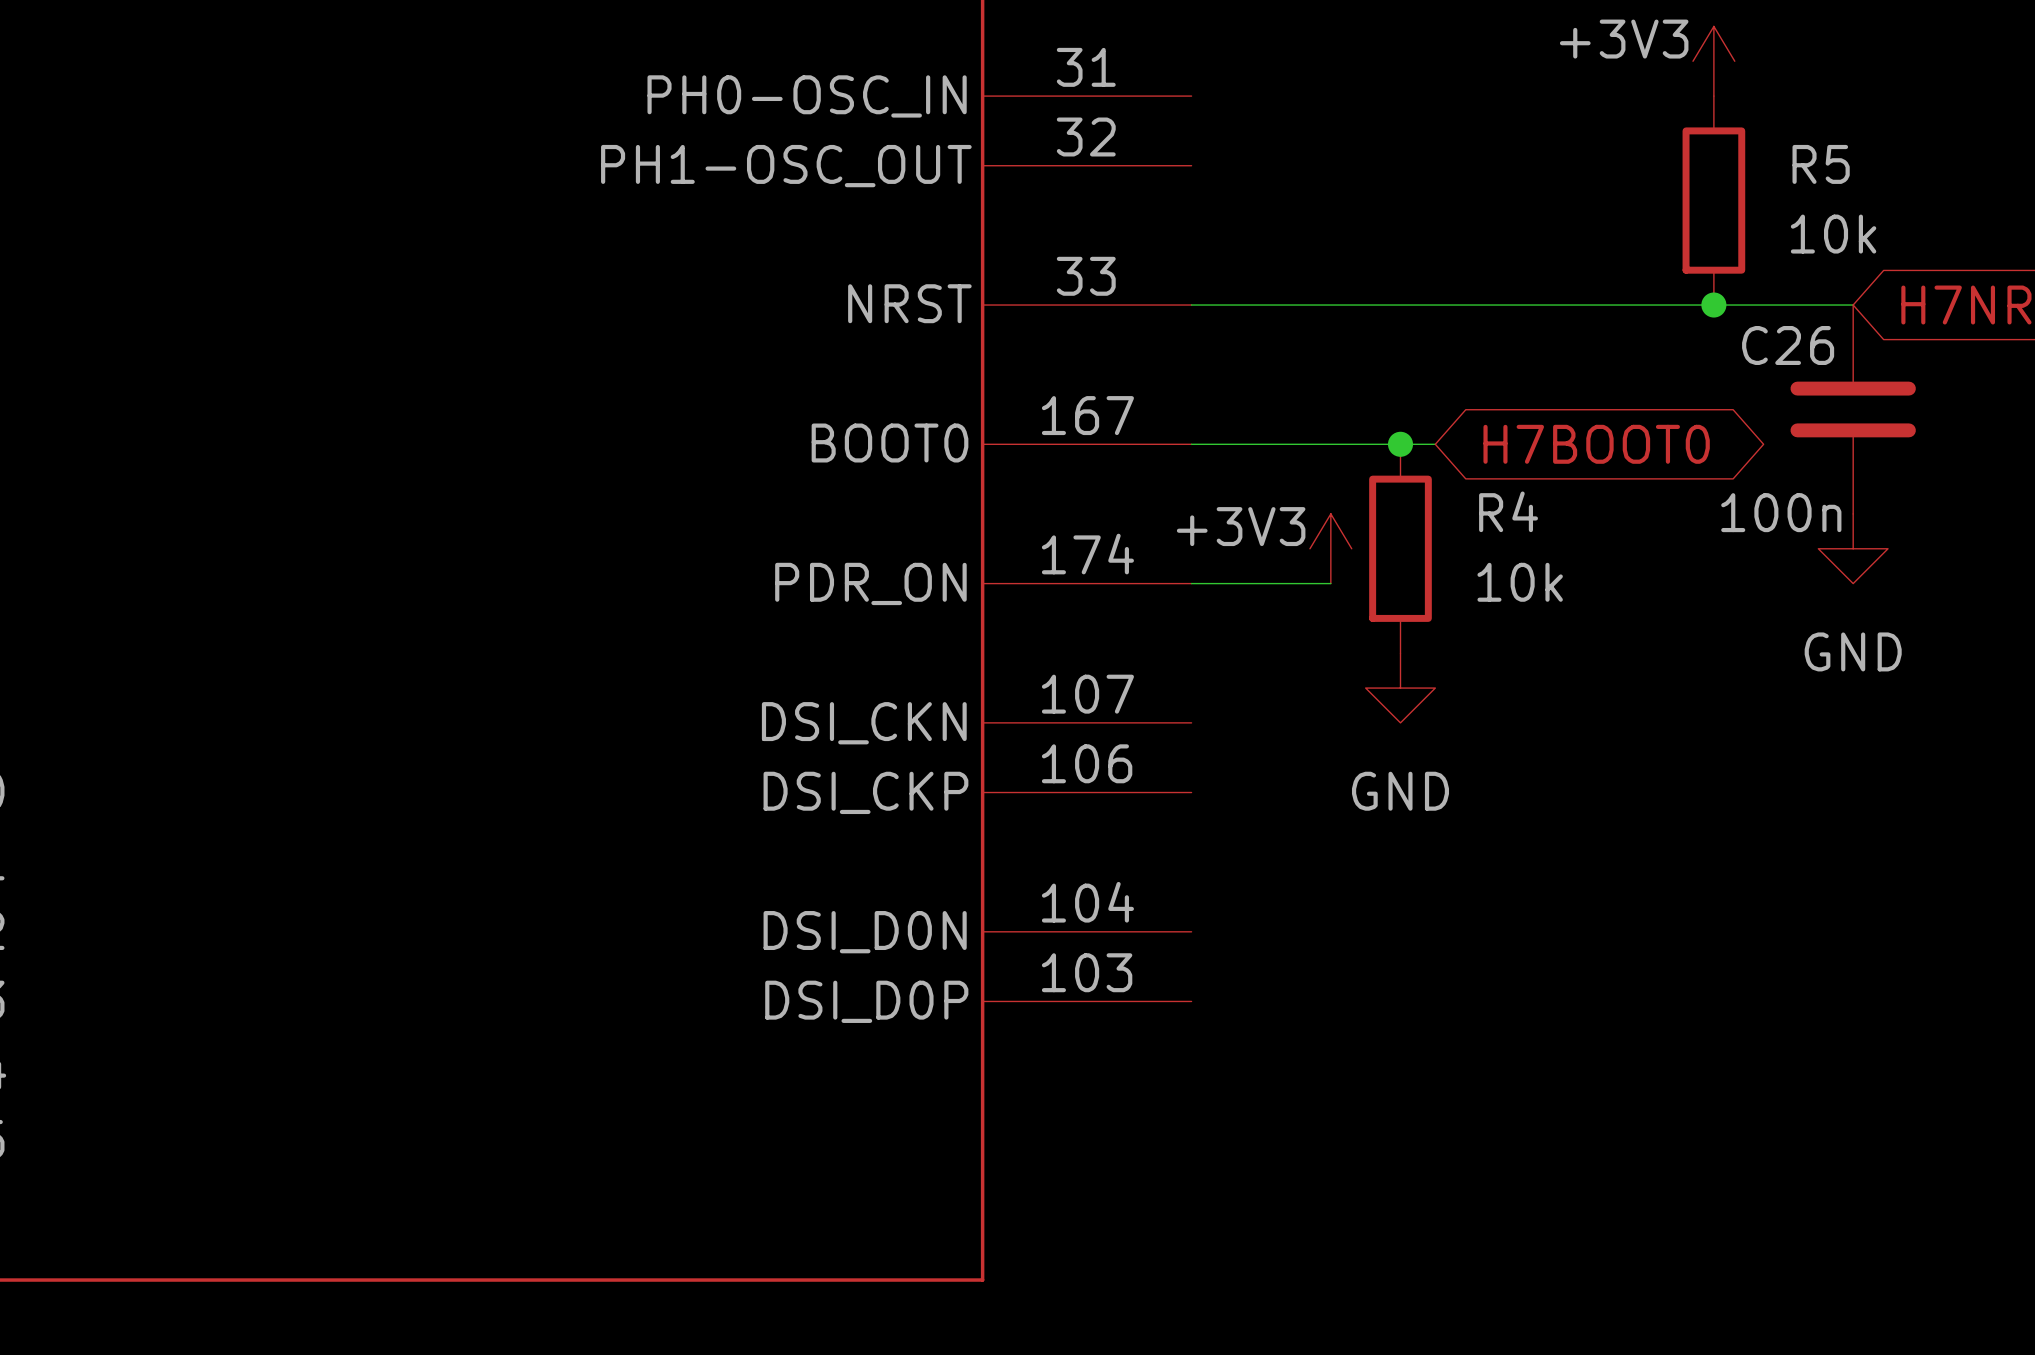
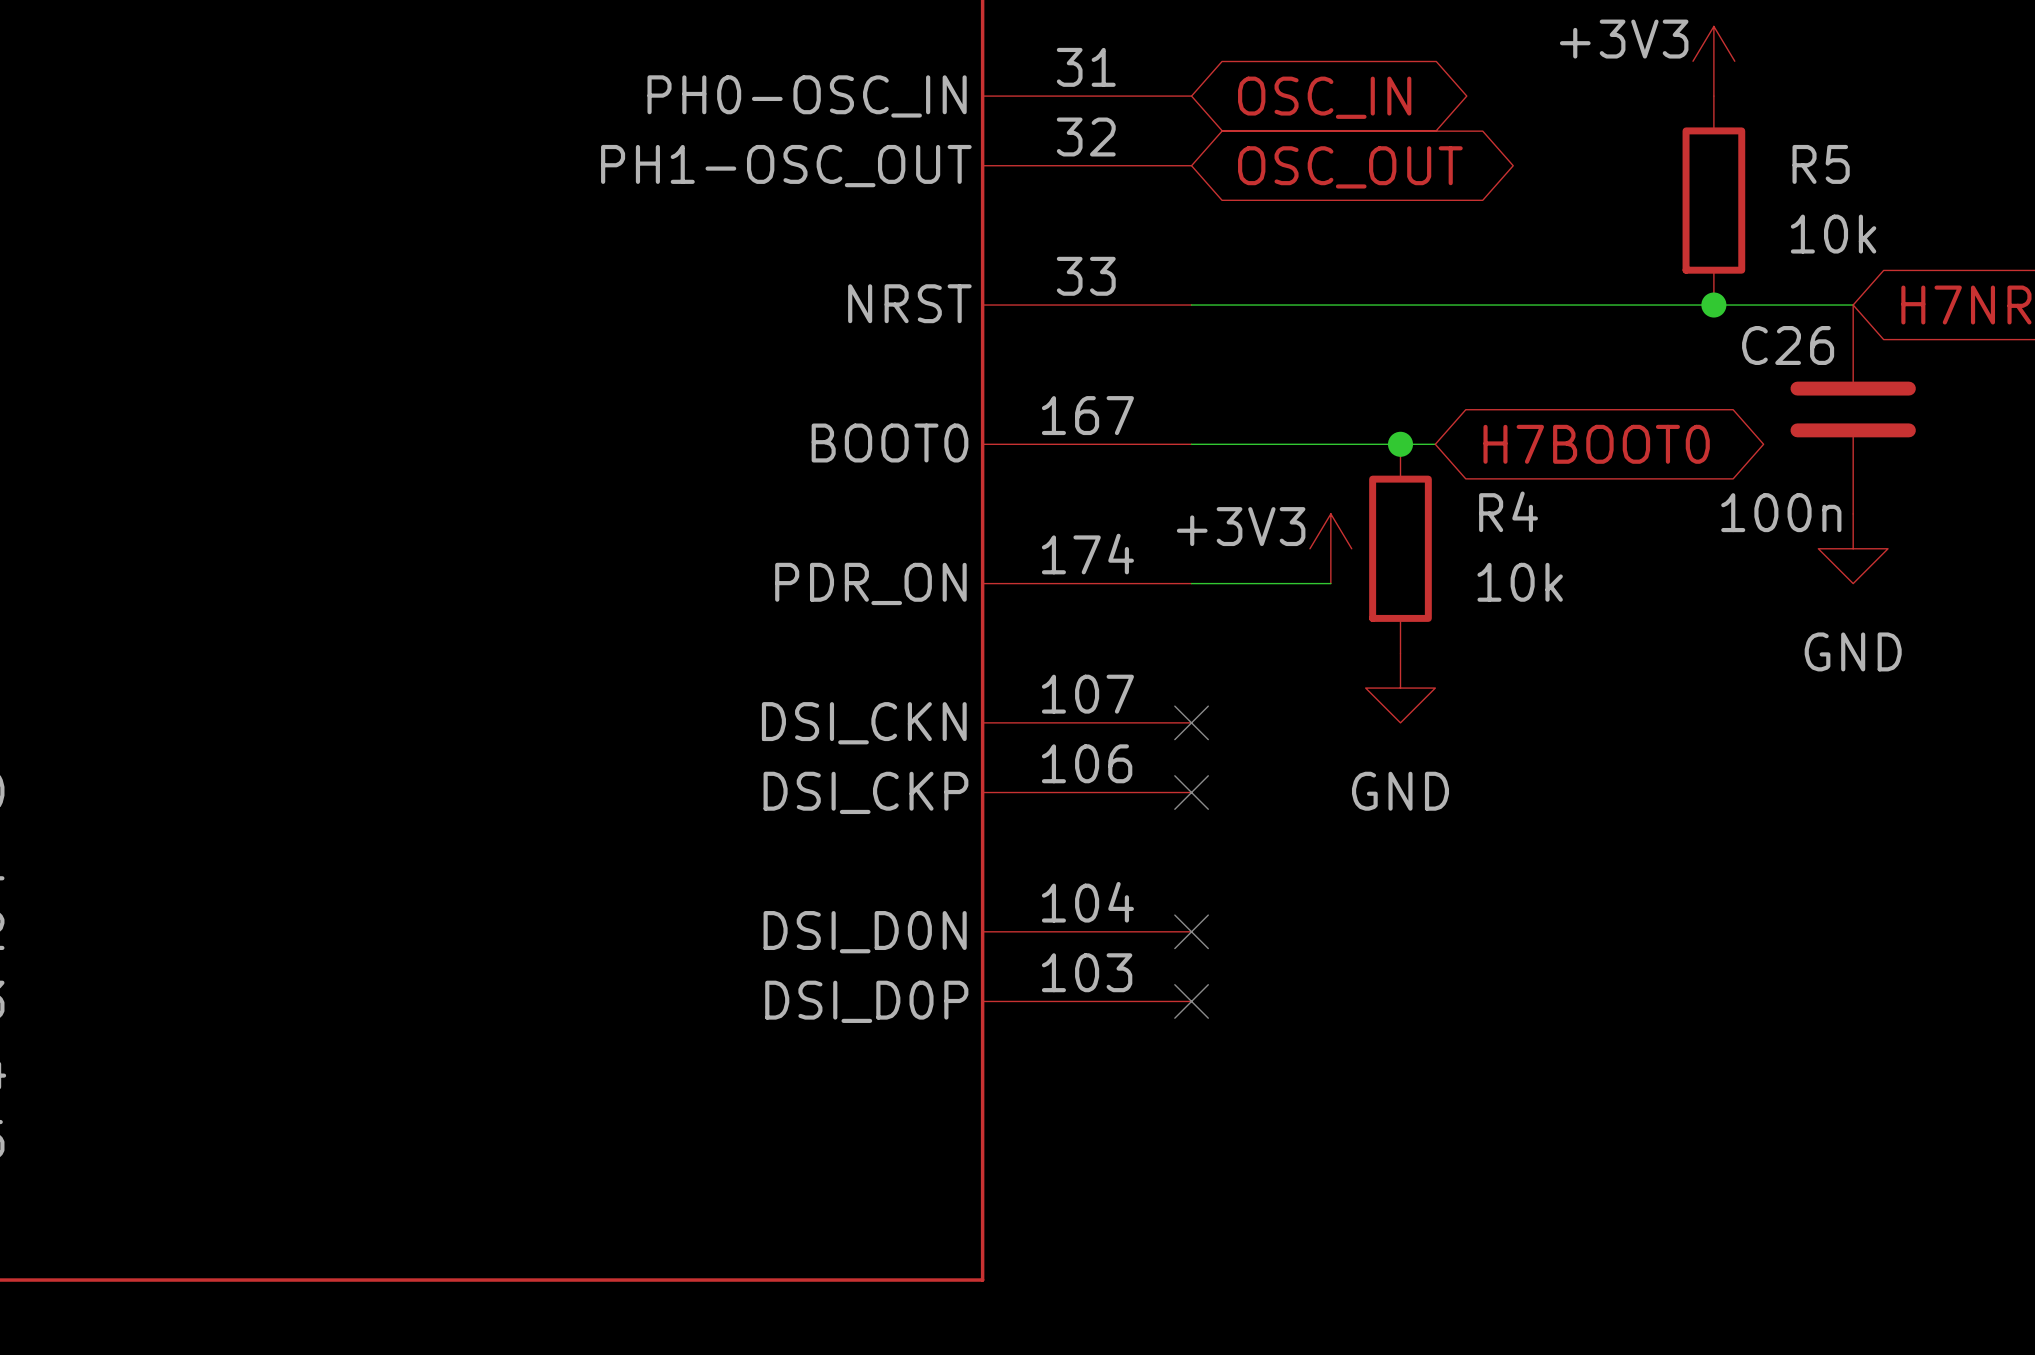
global label: none -> OSC_IN (1324, 97)
global label: none -> OSC_OUT (1350, 167)
no-connect mark: none -> (1191, 722)
no-connect mark: none -> (1191, 792)
no-connect mark: none -> (1191, 931)
no-connect mark: none -> (1191, 1001)

